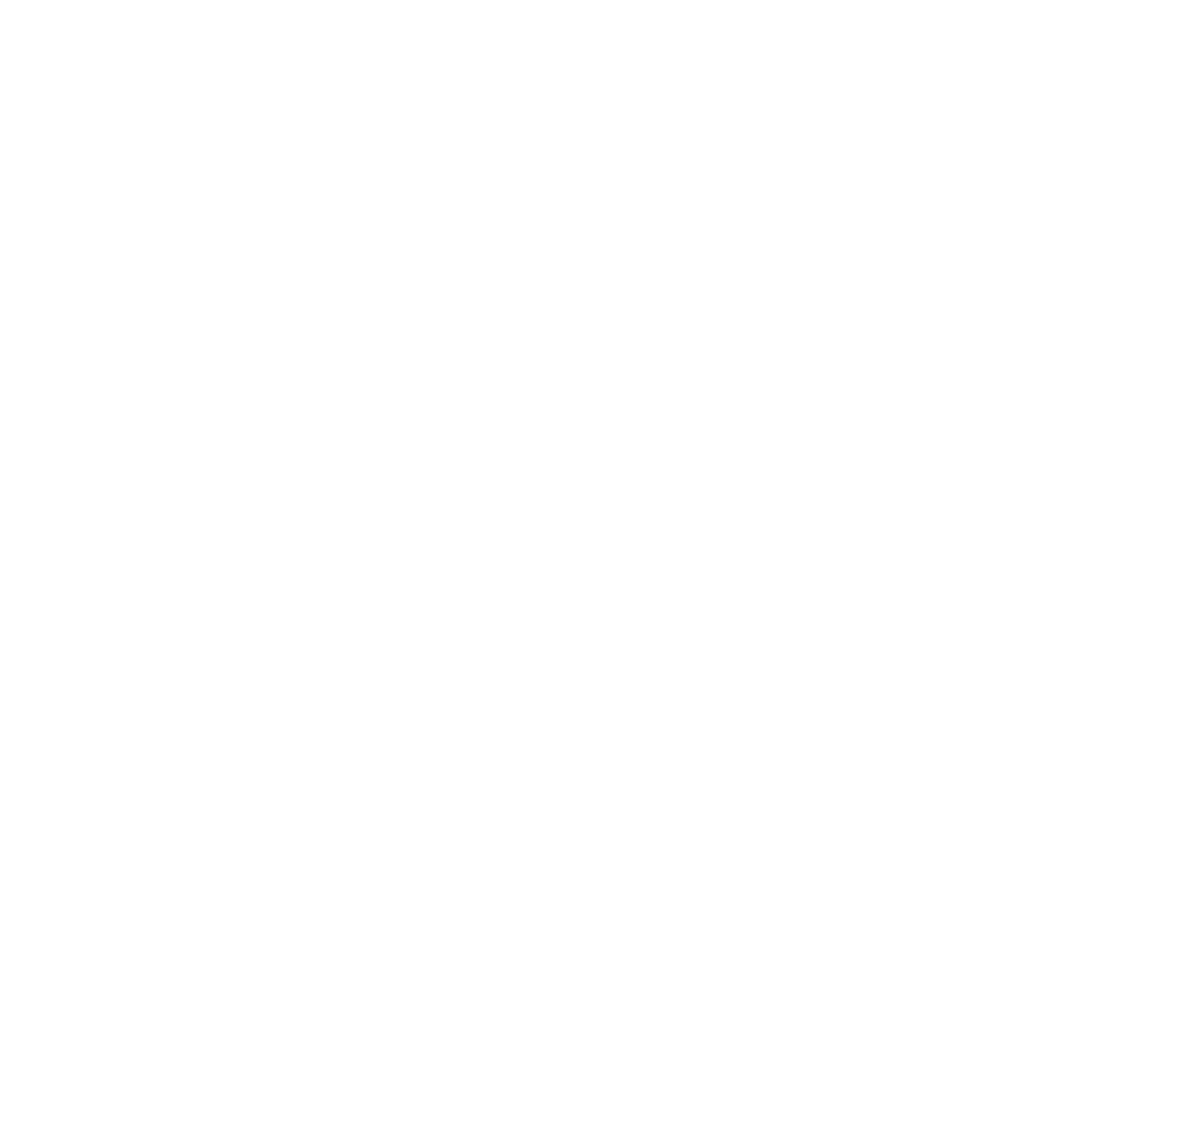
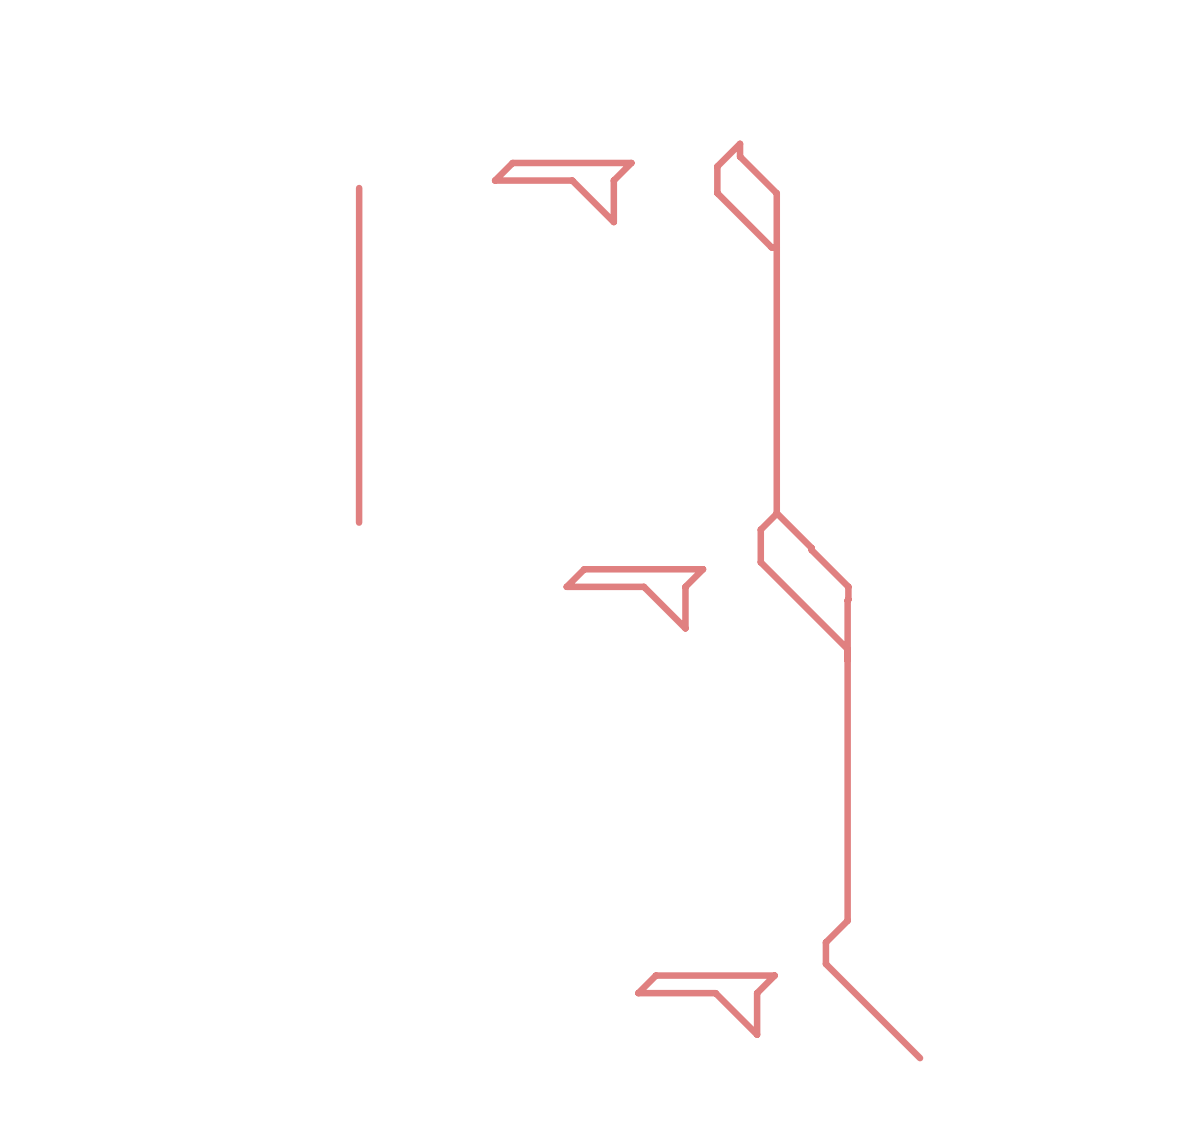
track: none -> (512, 162) (495, 180) (572, 180) (613, 222) (613, 180) (631, 162) (512, 162)
track: none -> (359, 188) (359, 522)
track: none -> (776, 247) (771, 247) (717, 193) (717, 166) (740, 143) (740, 156) (776, 193) (776, 513) (760, 529) (760, 562) (847, 649)
track: none -> (776, 513) (848, 586) (847, 920) (825, 942) (825, 964) (920, 1058)
track: none -> (584, 569) (566, 586) (643, 586) (685, 628) (685, 586) (703, 569) (584, 569)
track: none -> (655, 975) (638, 993) (715, 993) (757, 1034) (757, 993) (774, 975) (655, 975)

